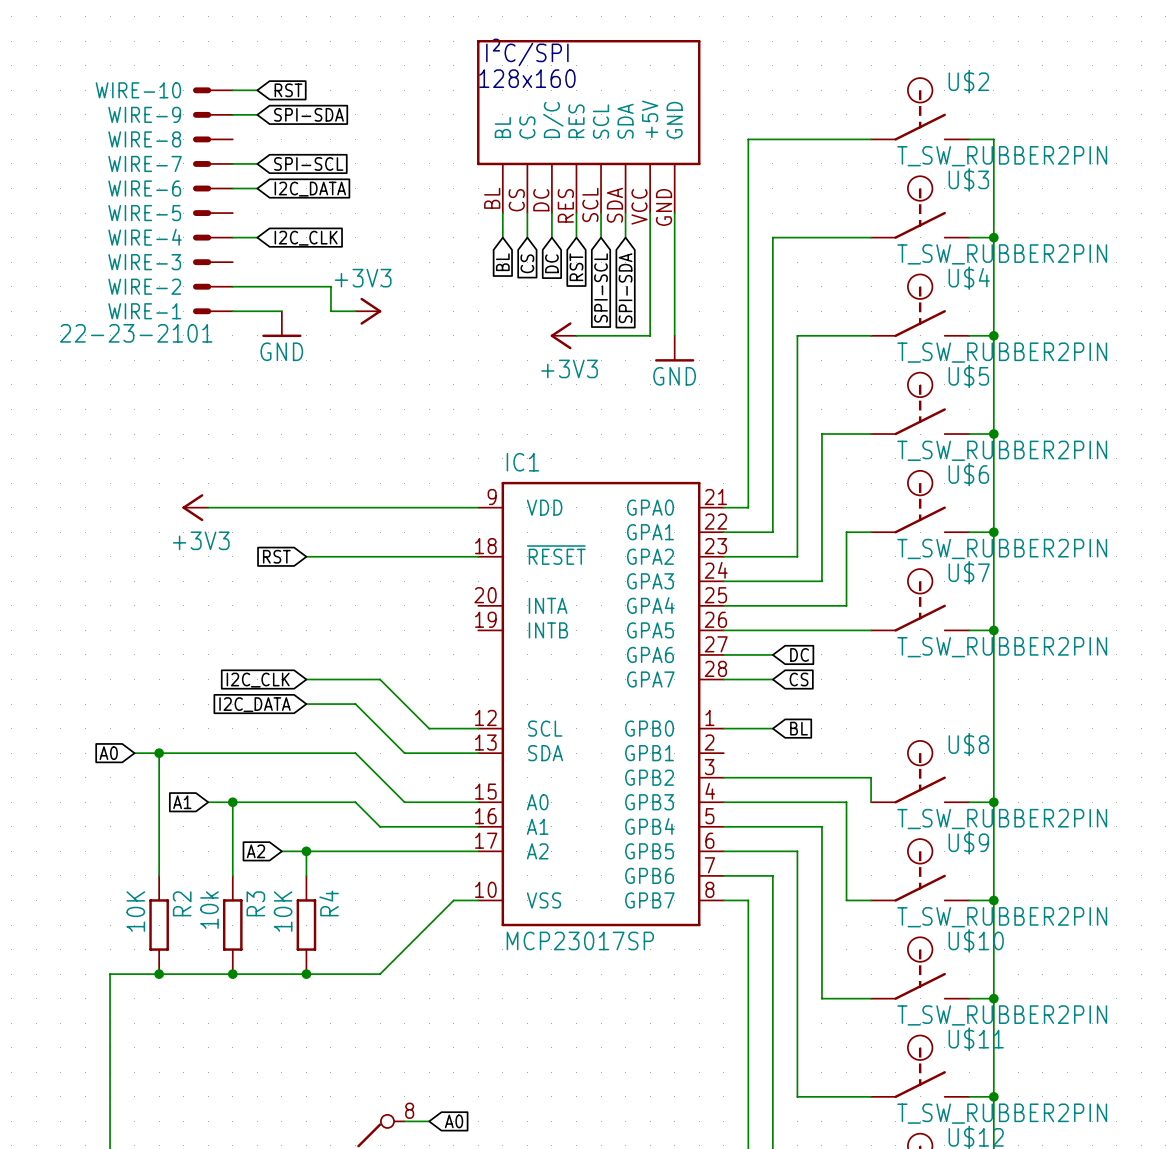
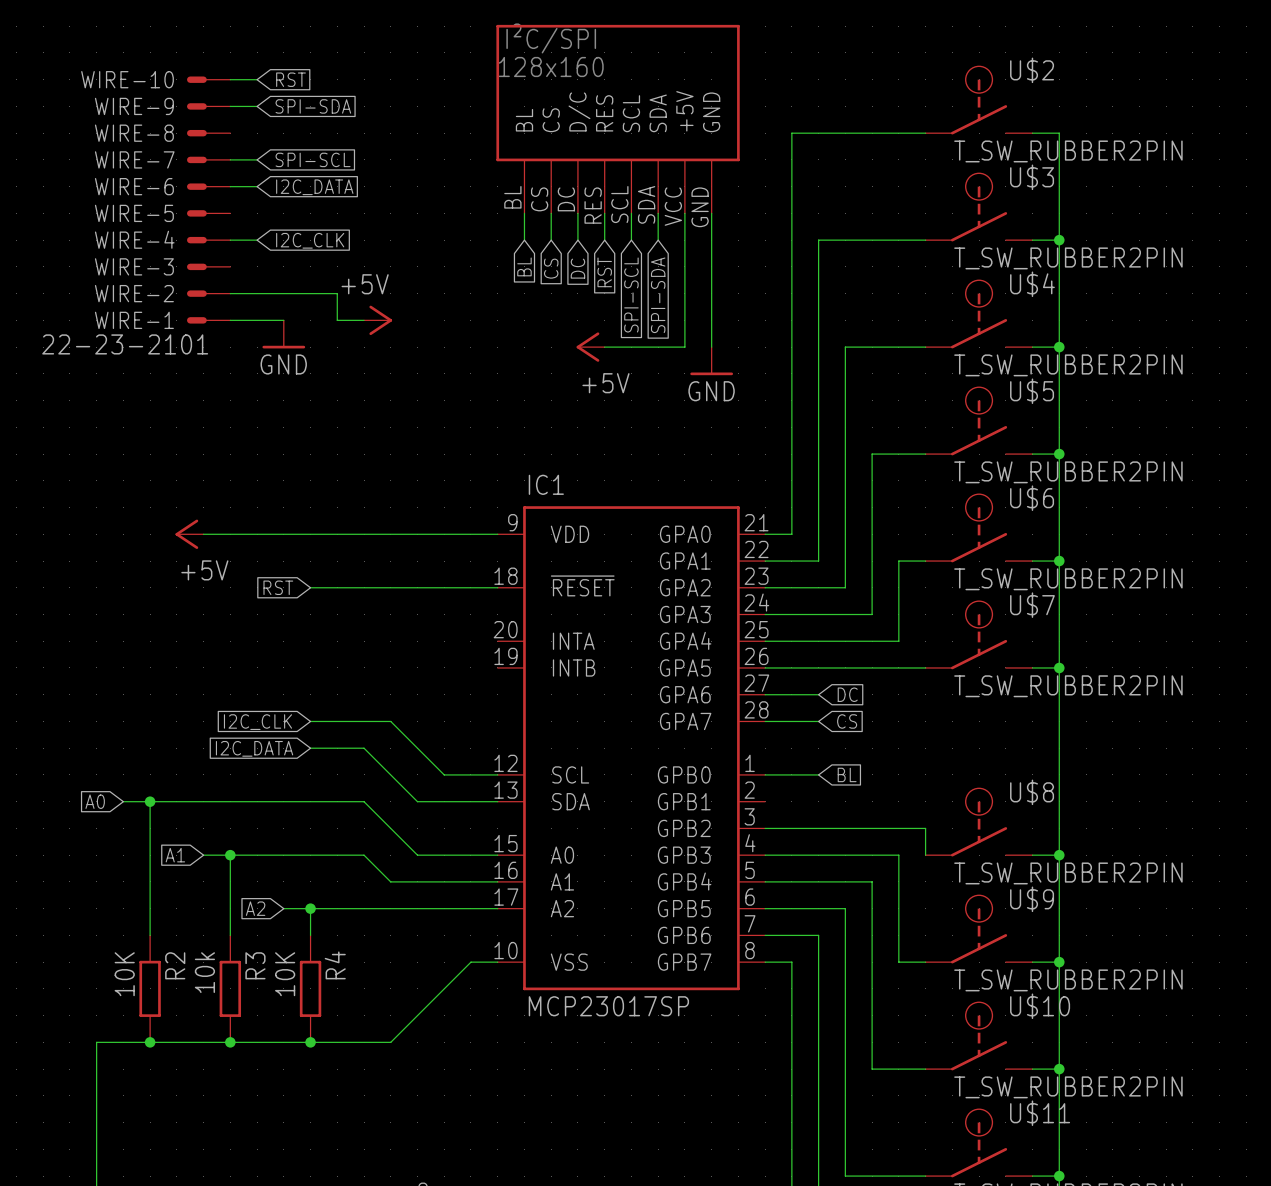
power symbol: +3V3 (368, 311) -> +5V (378, 320)
power symbol: +3V3 (563, 335) -> +5V (590, 347)
power symbol: +3V3 (195, 507) -> +5V (189, 534)

